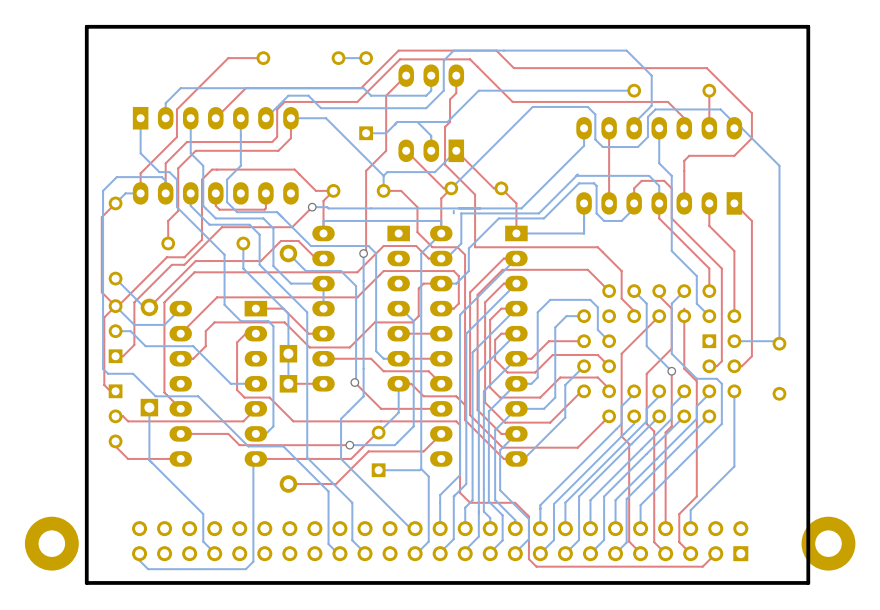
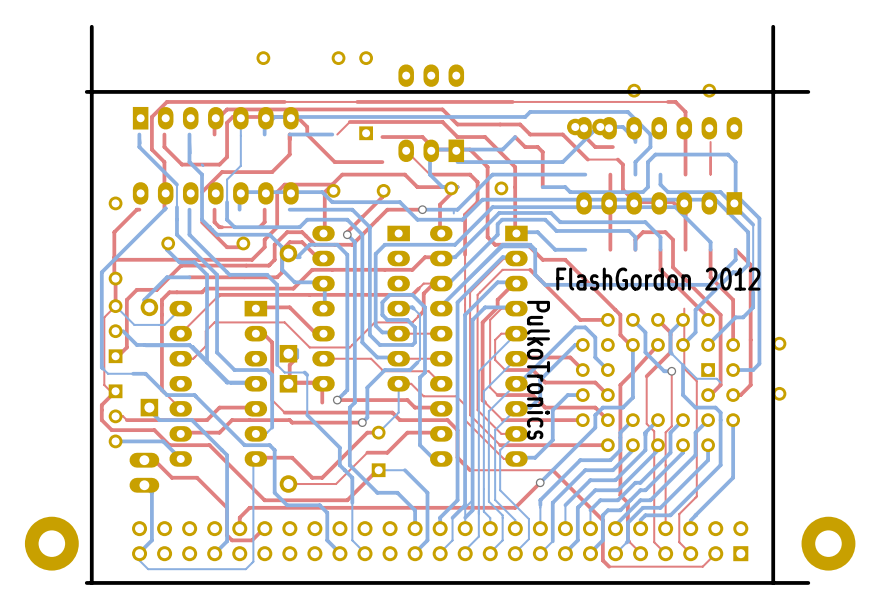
board edge: none -> (91, 26) (91, 582)
board edge: none -> (773, 26) (773, 582)
top track: (263, 58) (228, 58) (176, 109) (176, 137) (140, 173) (140, 193) -> none
bottom track: (366, 58) (338, 58) -> none
top track: (406, 75) (386, 95) (386, 150) (366, 170) (366, 251) (363, 253) -> none
bottom track: (431, 75) (431, 90) (426, 95) (371, 95) (363, 88) (180, 88) (165, 103) (165, 118) -> none
top track: (456, 75) (456, 93) (450, 99) (450, 121) (445, 127) (445, 164) (475, 194) (475, 247) (597, 247) (621, 271) (621, 298) (634, 311) (634, 316) -> none
bottom track: (634, 90) (478, 90) (447, 121) (397, 121) (386, 133) (366, 133) -> none
top track: (709, 90) (709, 128) -> none
board edge: none -> (808, 91) (86, 91)
top track: (284, 101) (277, 109) (277, 137) (272, 142) (186, 142) (165, 163) (165, 193) -> (284, 101) (166, 101) (151, 116) (151, 149) (164, 162) (164, 209) (164, 194)
top track: (512, 101) (470, 59) (399, 59) (357, 101) -> (512, 101) (357, 101)
top track: (667, 101) (684, 118) (684, 128) -> (667, 101) (675, 101) (685, 111) (685, 174) (685, 162)
bottom track: (140, 118) (140, 153) (159, 172) (169, 172) (176, 179) (176, 184) -> (140, 143) (139, 134) (139, 147) (176, 184)
bottom track: (190, 118) (190, 153) (202, 164) -> none
top track: (215, 118) (245, 88) (361, 88) (398, 50) (496, 50) (513, 68) (706, 68) (751, 113) (751, 138) (734, 155) (689, 155) (684, 160) (684, 203) -> none
bottom track: (265, 118) (288, 95) (308, 95) (321, 108) (426, 108) (443, 90) (443, 60) (453, 50) (626, 50) (651, 75) (651, 105) (634, 123) -> none
bottom track: (290, 118) (326, 118) (383, 175) -> none
top track: (290, 118) (290, 138) (278, 150) (195, 150) (178, 168) (178, 210) (168, 220) (168, 243) -> none
top track: none -> (349, 121) (337, 134)
bottom track: (417, 121) (431, 135) (431, 150) -> none
top track: none -> (442, 121) (457, 137)
top track: none -> (442, 121) (349, 121)
top track: none -> (575, 127) (595, 147) (612, 147)
part: none -> (587, 127)
bottom track: (584, 128) (584, 145) (521, 208) (312, 207) -> none
top track: (609, 128) (609, 203) -> (610, 174) (610, 249)
bottom track: (659, 128) (659, 163) (671, 175) (671, 251) (696, 276) (696, 303) (709, 316) -> none
top track: none -> (164, 134) (164, 147) (181, 164) (219, 164) (227, 157) (227, 122) (232, 116) (297, 116) (307, 127) (307, 134) (334, 162) (382, 162)
top track: none -> (214, 134) (214, 121) (227, 109) (442, 109) (457, 124) (520, 124) (530, 134) (562, 134) (587, 159) (617, 159) (622, 164) (622, 189) (635, 202) (673, 202) (685, 214) (685, 249) (685, 239)
bottom track: none -> (264, 134) (264, 127) (274, 116) (525, 116) (530, 111) (627, 111) (650, 134) (650, 147) (635, 162) (635, 174)
bottom track: none -> (332, 134) (289, 134)
top track: none -> (382, 137) (422, 137) (435, 149) (470, 149) (487, 167) (487, 237) (495, 244) (527, 244) (542, 259) (565, 259) (620, 314) (620, 334) (630, 344) (632, 344)
top track: none -> (457, 137) (485, 137) (515, 167) (515, 232)
bottom track: none -> (515, 137) (502, 149) (437, 149) (429, 157) (429, 174) (442, 187) (457, 187)
top track: none -> (515, 137) (525, 147) (537, 147) (542, 152) (542, 187)
bottom track: none -> (635, 142) (635, 139) (622, 127) (597, 127) (562, 162) (457, 162)
top track: none -> (710, 142) (710, 174)
bottom track: (456, 150) (435, 172) (387, 172) (383, 175) -> none
top track: (456, 150) (493, 188) (501, 188) (516, 203) (516, 233) -> none
bottom track: none -> (190, 153) (189, 134) (189, 162) (202, 174) (202, 219) (209, 227)
bottom track: (203, 165) (203, 205) (215, 218) (263, 218) (273, 228) (273, 266) (290, 283) (323, 283) (323, 308) -> none
top track: (429, 174) (443, 188) (451, 188) (441, 198) (441, 233) -> (429, 174) (470, 174) (477, 182) (477, 202) (465, 214) (465, 254)
bottom track: (577, 174) (538, 213) (461, 213) (461, 243) (446, 258) (441, 258) -> none
bottom track: none -> (585, 174) (492, 174) (457, 209) (422, 209)
bottom track: none -> (660, 174) (660, 184) (667, 192) (720, 192) (753, 224) (753, 307) (743, 317) (735, 317) (708, 344)
bottom track: (383, 175) (383, 190) -> none
bottom track: (576, 175) (649, 175) (659, 185) (659, 203) -> none
top track: none -> (284, 184) (277, 192) (277, 227) (264, 239) (264, 247) (252, 259) (114, 259)
top track: none -> (332, 184) (284, 184)
top track: none -> (382, 187) (382, 197) (347, 232) (347, 234)
bottom track: none -> (542, 187) (565, 187) (570, 192) (642, 192) (647, 187) (647, 162) (655, 154) (728, 154) (735, 162) (735, 194) (759, 218) (759, 363) (753, 370) (733, 370)
bottom track: (451, 188) (532, 106) (587, 106) (595, 114) (595, 139) (602, 147) (637, 147) (647, 137) (647, 116) (655, 109) (720, 109) (734, 123) (734, 128) (741, 128) (779, 165) (779, 343) (776, 341) (734, 341) -> none
top track: (383, 190) (401, 190) (417, 207) (417, 232) (432, 247) (457, 247) (465, 254) -> none
top track: (202, 192) (202, 179) (212, 169) (294, 169) (316, 190) (333, 190) (323, 200) (323, 233) -> (202, 192) (222, 172) (272, 172) (289, 154) (289, 134)
bottom track: (140, 193) (125, 193) (115, 203) -> none
bottom track: (165, 193) (165, 180) (161, 177) (116, 177) (103, 190) (103, 368) -> (165, 208) (101, 272) (103, 368)
bottom track: (190, 193) (190, 205) (209, 224) (249, 224) (259, 234) (259, 264) (307, 312) (307, 375) -> (189, 209) (189, 234) (229, 274) (267, 274) (277, 284) (277, 365) (284, 372) (304, 372) (307, 375)
top track: (265, 193) (264, 209) (219, 209) (215, 205) (215, 193) -> none
bottom track: (227, 202) (237, 212) (277, 212) (310, 246) (368, 246) (376, 253) (376, 351) (383, 358) (398, 358) -> (227, 202) (227, 219) (234, 227) (299, 227) (307, 219) (347, 219) (362, 234) (362, 342) (377, 357) (399, 357)
top track: (115, 203) (101, 217) (101, 292) (115, 306) -> (139, 209) (136, 209) (114, 232) (115, 306)
bottom track: (584, 203) (584, 233) (516, 233) -> none
bottom track: (634, 203) (634, 208) (621, 220) (604, 220) (596, 213) (596, 185) (594, 183) (579, 183) (543, 218) (498, 218) (468, 248) (468, 271) (456, 283) (441, 283) -> none
top track: (634, 203) (634, 188) (641, 180) (664, 180) (671, 188) (671, 218) (721, 268) (721, 361) (716, 366) (709, 366) -> none
top track: (659, 203) (659, 218) (709, 268) (709, 291) -> none
top track: (709, 203) (709, 225) (734, 251) (734, 316) -> none
top track: (734, 203) (751, 220) (751, 356) (741, 366) (734, 366) -> none
bottom track: (176, 207) (224, 254) (224, 304) (240, 321) (268, 321) (273, 326) (272, 427) -> (176, 207) (176, 234) (217, 274) (217, 352) (234, 370) (267, 370) (272, 375) (272, 427)
top track: (312, 207) (292, 227) (259, 227) -> (264, 209) (264, 222) (259, 227)
via: (312, 207) -> none
bottom track: none -> (239, 209) (239, 199) (247, 192) (322, 192) (332, 202) (399, 202) (417, 219) (462, 219) (482, 199) (715, 199) (748, 232) (748, 264) (740, 272) (733, 272) (695, 309) (695, 332) (683, 344)
bottom track: none -> (289, 209) (352, 209) (369, 227) (369, 334) (379, 344) (412, 344) (414, 342) (414, 327) (407, 319) (387, 319) (382, 314) (382, 302) (389, 294) (412, 294) (424, 307) (424, 372) (419, 377) (419, 445) (433, 458) (440, 457)
top track: none -> (422, 209) (387, 209) (352, 244) (314, 244) (302, 232) (287, 232) (274, 244) (274, 259) (268, 265) (181, 265) (156, 289) (136, 289) (126, 299) (126, 347) (118, 356)
via: none -> (422, 209)
top track: (202, 222) (202, 239) (184, 257) (166, 257) (118, 306) -> (202, 222) (227, 247) (242, 247)
bottom track: none -> (209, 227) (217, 234) (269, 234) (282, 247) (282, 269) (294, 282) (324, 282) (324, 307)
top track: (222, 227) (184, 264) (171, 264) (134, 302) (134, 344) (123, 356) (118, 356) -> (222, 227) (214, 222) (214, 209)
top track: none -> (440, 232) (440, 204) (457, 187) (417, 187) (404, 174) (342, 174) (324, 192) (324, 232)
bottom track: none -> (515, 232) (537, 232) (555, 249) (585, 249)
bottom track: (323, 233) (323, 220) (441, 220) (441, 233) (421, 253) (421, 468) -> none
via: none -> (347, 234)
bottom track: (243, 243) (243, 268) (288, 313) (288, 383) -> none
bottom track: none -> (166, 247) (166, 249) (179, 262) (194, 262) (207, 274) (207, 362)
bottom track: none -> (635, 249) (635, 237) (629, 230) (556, 230) (545, 219) (502, 219) (497, 224) (497, 234) (450, 282) (440, 282)
top track: none -> (635, 249) (635, 239) (642, 232) (665, 232) (673, 239) (673, 267) (720, 314) (720, 385) (710, 395) (708, 395)
bottom track: none -> (660, 249) (660, 237) (645, 222) (560, 222) (551, 212) (499, 212) (455, 257) (440, 257)
top track: none -> (660, 249) (660, 269) (708, 317) (708, 319)
bottom track: none -> (710, 249) (710, 242) (675, 207) (492, 207) (455, 244) (384, 244) (375, 253) (375, 325) (382, 332) (399, 332)
top track: none -> (710, 249) (710, 277) (733, 299) (733, 344)
bottom track: none -> (735, 249) (735, 259) (710, 284) (545, 284) (535, 274) (535, 249) (530, 244) (502, 244) (440, 307) (502, 247) (530, 247) (535, 252)
top track: none -> (735, 249) (750, 264) (750, 385)
bottom track: (288, 253) (305, 271) (341, 271) (356, 286) (356, 383) (354, 382) -> none
bottom track: (363, 253) (363, 396) (341, 418) (341, 458) (410, 528) (415, 528) -> (347, 234) (354, 242) (354, 402) (349, 407) (349, 465) (377, 492) (397, 492) (415, 510) (415, 528)
via: (363, 253) -> none
bottom track: none -> (299, 257) (297, 257) (309, 244) (337, 244) (347, 254) (347, 390) (337, 400)
top track: none -> (324, 257) (317, 257) (302, 242) (289, 242) (282, 249) (282, 272) (277, 277) (189, 277)
top track: (323, 258) (316, 258) (298, 240) (280, 240) (260, 261) (195, 261) (149, 307) -> none
top track: (441, 258) (428, 258) (416, 246) (383, 246) (357, 272) (194, 272) (164, 302) (164, 392) -> (440, 257) (424, 257) (412, 269) (312, 269) (293, 288) (205, 288) (202, 292) (169, 292) (161, 299) (161, 390) (164, 392)
bottom track: (516, 258) (460, 314) (460, 475) (440, 495) (440, 517) -> none
bottom track: none -> (515, 259) (515, 257) (502, 257) (457, 302) (457, 500) (440, 517) (440, 528)
top track: (530, 269) (587, 269) (609, 291) -> (530, 269) (580, 319) (607, 319)
bottom track: none -> (189, 277) (166, 277) (144, 299) (144, 304)
bottom track: (115, 278) (144, 307) (149, 307) -> none
text: none -> FlashGordon 2012 (658, 279)
bottom track: (516, 283) (466, 333) (466, 484) (453, 496) (452, 540) -> (515, 282) (497, 282) (465, 314) (465, 505) (452, 517) (452, 540)
top track: (516, 283) (503, 283) (485, 302) (485, 402) -> (515, 282) (497, 299) (497, 307) (482, 322) (482, 400) (485, 402)
top track: (418, 288) (418, 316) -> (440, 282) (433, 283) (423, 293) (423, 311) (418, 316)
bottom track: (634, 291) (646, 303) (646, 346) (671, 371) -> (632, 319) (645, 332) (645, 352) (664, 371) (671, 371)
top track: (659, 291) (659, 296) (671, 308) (671, 348) (646, 373) (646, 376) -> (657, 319) (670, 332) (670, 352) (646, 376)
bottom track: (684, 291) (671, 303) (671, 353) -> (683, 319) (670, 332) (671, 353)
top track: (217, 297) (357, 297) (383, 271) (453, 271) (458, 276) (458, 303) (453, 308) (441, 308) -> (217, 297) (219, 294) (412, 294) (418, 288)
top track: none -> (254, 307) (289, 307) (314, 332) (324, 332)
bottom track: none -> (399, 307) (412, 307) (419, 314) (419, 359) (409, 370) (384, 370) (367, 387) (367, 417) (362, 422)
bottom track: none -> (515, 307) (485, 307) (472, 319) (472, 510)
top track: (255, 308) (283, 308) (308, 333) (323, 333) -> none
bottom track: (398, 308) (401, 308) (413, 321) (413, 426) (394, 445) (349, 445) -> none
bottom track: (516, 308) (472, 352) -> none
bottom track: (584, 316) (566, 316) (555, 327) (555, 397) (543, 408) (515, 410) -> (582, 344) (575, 344) (540, 380) (540, 397) (530, 407) (515, 407) (515, 410)
top track: (659, 316) (621, 353) (621, 436) (629, 443) (629, 541) -> (657, 344) (620, 385) (620, 495) (627, 502) (629, 541)
bottom track: (123, 331) (130, 331) (145, 346) -> (123, 331) (136, 344) (189, 344) (227, 382) (254, 382)
top track: (255, 333) (245, 333) (237, 342) (237, 390) (244, 397) (269, 397) (272, 400) -> (254, 332) (262, 332) (272, 342) (272, 400)
bottom track: none -> (595, 337) (595, 357) (607, 370)
top track: (584, 341) (548, 341) (531, 358) (516, 358) -> none
bottom track: (609, 341) (597, 329) (597, 307) (590, 299) (550, 299) (537, 312) (537, 377) (531, 383) (515, 385) -> (595, 337) (585, 327) (575, 327) (520, 382) (515, 382) (515, 385)
bottom track: none -> (632, 344) (632, 397) (622, 407) (602, 407) (595, 415) (595, 427) (540, 482)
bottom track: none -> (297, 349) (297, 357)
part position: (659, 353) -> (657, 382)
top track: none -> (297, 357) (289, 365) (289, 385) (292, 382) (324, 382) (322, 385) (322, 402)
top track: none -> (515, 357) (570, 357) (582, 370)
bottom track: (584, 366) (565, 385) (565, 417) (523, 458) (516, 458) -> none
top track: (609, 366) (597, 354) (552, 354) (535, 372) (507, 372) (505, 370) -> (607, 395) (595, 382) (545, 382) (532, 370) (505, 370)
text: none -> PulkoTronics (538, 370)
bottom track: (133, 373) (155, 396) (198, 396) (248, 446) (283, 446) (328, 491) (328, 544) (338, 553) -> (133, 373) (145, 373) (166, 395) (194, 395) (244, 445) (269, 445) (274, 450) (274, 492) (287, 505) (319, 505) (327, 512) (327, 540) (339, 553)
top track: (354, 382) (381, 408) (441, 408) -> none
via: (354, 382) -> none
bottom track: (720, 382) (721, 423) (640, 505) (640, 520) -> (683, 365) (683, 395) (695, 407) (715, 407) (720, 412) (720, 465) (670, 515) (645, 515) (640, 520)
top track: none -> (750, 385) (740, 395) (733, 395)
top track: none -> (115, 391) (101, 405) (101, 420) (111, 430) (154, 430) (169, 445) (209, 445) (264, 500) (347, 500) (378, 470)
top track: (584, 391) (581, 391) (550, 422) (505, 422) (502, 420) -> (582, 420) (502, 420)
top track: (609, 391) (609, 388) (597, 377) (560, 377) (540, 397) (500, 397) (497, 395) -> (607, 420) (595, 407) (545, 407) (532, 395) (497, 395)
bottom track: (634, 391) (634, 393) (621, 406) (621, 423) (540, 505) -> (632, 420) (620, 432) (620, 450) (610, 460) (580, 460) (540, 500) (540, 505)
bottom track: (659, 391) (659, 396) (646, 408) (646, 421) (565, 502) (565, 505) -> (657, 420) (645, 432) (645, 450) (615, 480) (590, 480) (565, 505)
bottom track: (684, 391) (684, 393) (671, 406) (671, 418) (590, 500) (590, 510) -> (683, 420) (670, 432) (670, 452) (640, 482) (635, 482) (617, 500) (600, 500) (590, 510)
bottom track: (709, 391) (709, 393) (696, 406) (696, 418) (615, 500) (615, 525) -> (708, 420) (695, 432) (695, 455) (650, 500) (640, 500) (615, 525)
bottom track: (734, 391) (734, 466) (690, 510) (690, 520) -> (733, 420) (733, 477) (690, 520)
bottom track: none -> (582, 395) (567, 395) (552, 410) (552, 440) (535, 457) (515, 457)
top track: none -> (337, 400) (407, 400) (414, 407) (440, 407)
via: none -> (337, 400)
bottom track: none -> (144, 405) (159, 420) (191, 420) (227, 455) (227, 541) (214, 553)
bottom track: (149, 407) (150, 461) -> none
top track: (255, 408) (243, 421) (126, 420) -> (254, 407) (219, 407) (207, 420) (126, 420)
top track: (284, 412) (293, 421) (456, 421) (460, 425) (460, 492) (470, 502) (515, 502) (528, 516) (528, 559) (536, 566) (609, 566) -> (284, 412) (392, 412) (399, 420) (447, 420) (457, 430) (457, 457) (470, 470)
bottom track: (307, 415) (307, 457) (352, 502) -> (307, 415) (339, 447) (339, 465) (352, 477) (352, 502)
top track: (609, 416) (577, 447) (502, 447) (500, 445) -> (607, 445) (500, 445)
bottom track: (634, 416) (634, 423) (554, 504) (552, 541) -> (632, 445) (632, 450) (612, 470) (585, 470) (552, 502) (552, 541)
bottom track: (659, 416) (579, 496) (579, 540) (565, 553) -> (657, 445) (657, 450) (617, 490) (595, 490) (577, 507) (577, 540) (565, 553)
bottom track: (684, 416) (604, 496) (604, 540) (590, 553) -> (683, 445) (683, 452) (645, 490) (640, 490) (620, 510) (607, 510) (602, 515) (602, 540) (590, 553)
bottom track: (709, 416) (626, 499) (626, 542) -> (708, 445) (708, 460) (660, 507) (642, 507) (627, 522) (626, 542)
top track: none -> (362, 422) (232, 420) (219, 432) (179, 432)
via: none -> (362, 422)
top track: (377, 432) (351, 458) (255, 458) -> (377, 432) (367, 432) (322, 477) (312, 477) (292, 457) (254, 457)
top track: (180, 433) (228, 433) (239, 445) (349, 445) -> none
top track: (441, 433) (423, 451) (367, 452) -> (440, 432) (407, 432) (387, 452) (367, 452)
bottom track: none -> (115, 441) (163, 441) (179, 457)
top track: (115, 441) (115, 446) (128, 458) (180, 458) -> none
via: (349, 445) -> none
top track: none -> (144, 460) (154, 460) (171, 477) (197, 477) (227, 507) (227, 535) (232, 540) (252, 540) (264, 528)
bottom track: (151, 462) (203, 514) (203, 541) (214, 553) -> none
bottom track: (421, 468) (428, 476) (428, 541) (415, 553) -> (404, 470) (427, 492) (427, 540) (415, 553)
bottom track: (421, 468) (404, 470) -> none
top track: none -> (470, 470) (552, 470) (602, 520) (602, 560) (609, 566)
part: none -> (144, 472)
top track: none -> (540, 482) (515, 507) (249, 507) (239, 517) (239, 528)
via: none -> (540, 482)
bottom track: none -> (144, 485) (151, 492) (151, 540) (139, 553)
bottom track: none -> (472, 510) (465, 517)
board edge: (808, 582) (808, 26) (86, 26) (86, 582) -> none

